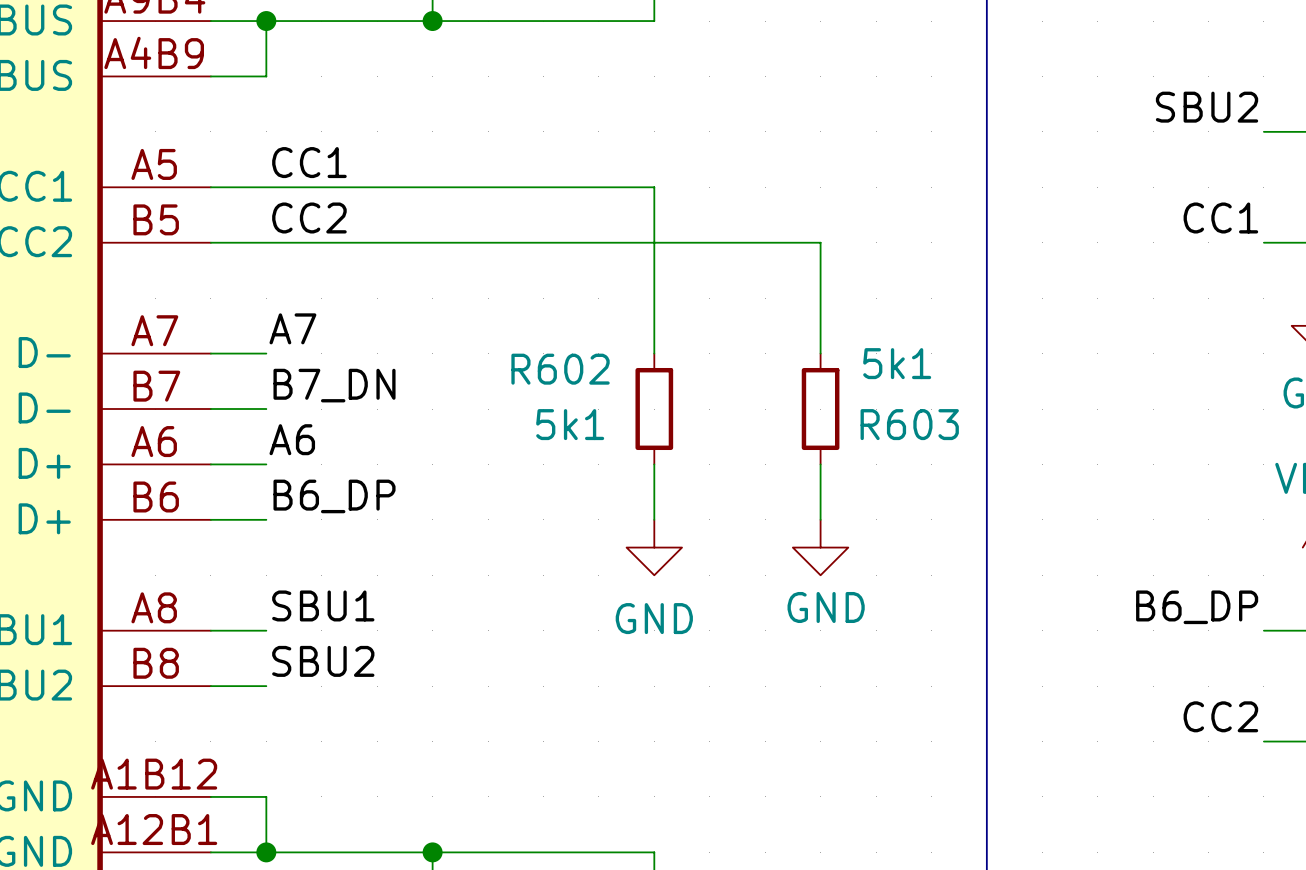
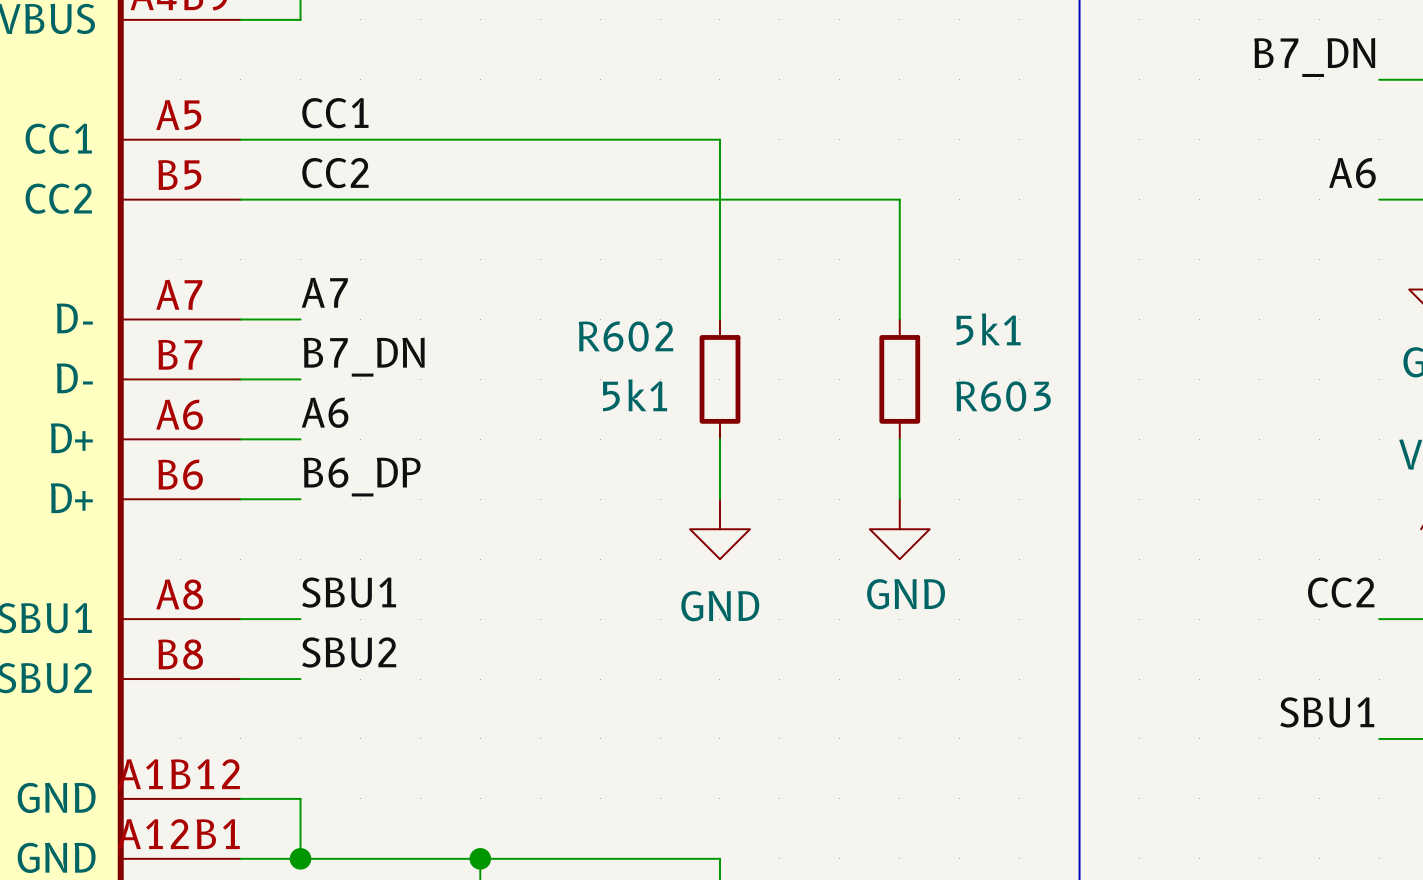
label: SBU2 (1207, 107) -> B7_DN (1314, 57)
label: CC1 (1220, 217) -> A6 (1352, 173)
label: B6_DP (1197, 607) -> CC2 (1341, 592)
label: CC2 (1220, 716) -> SBU1 (1327, 712)

